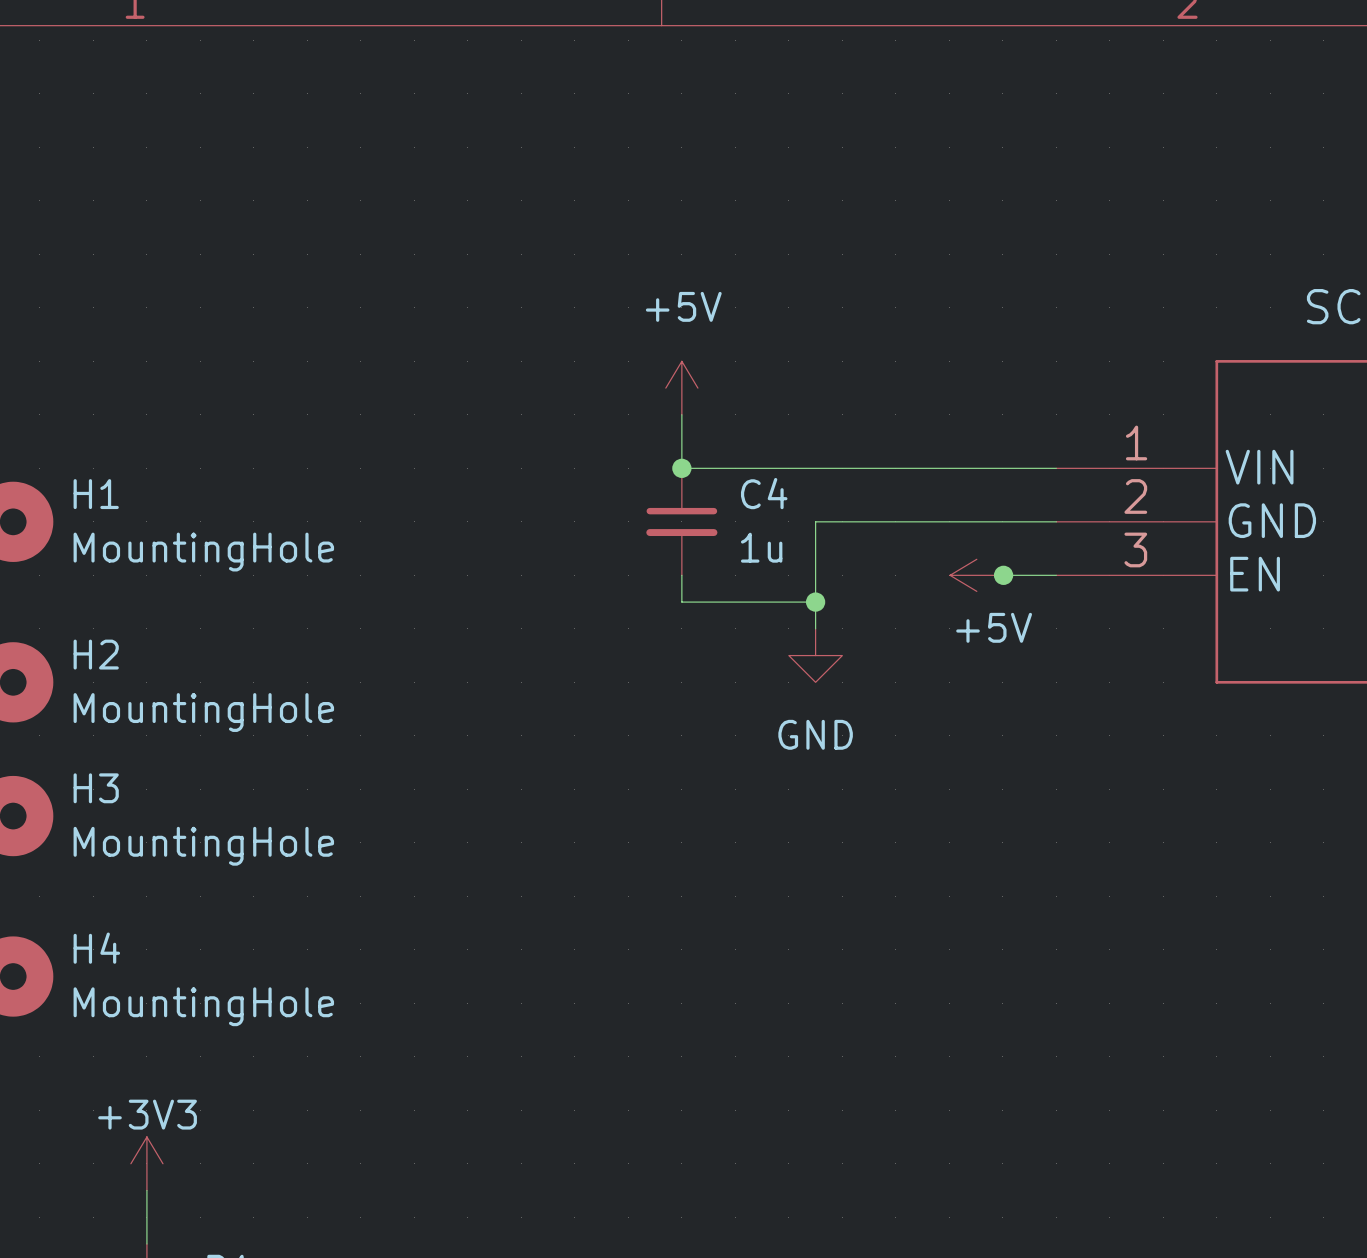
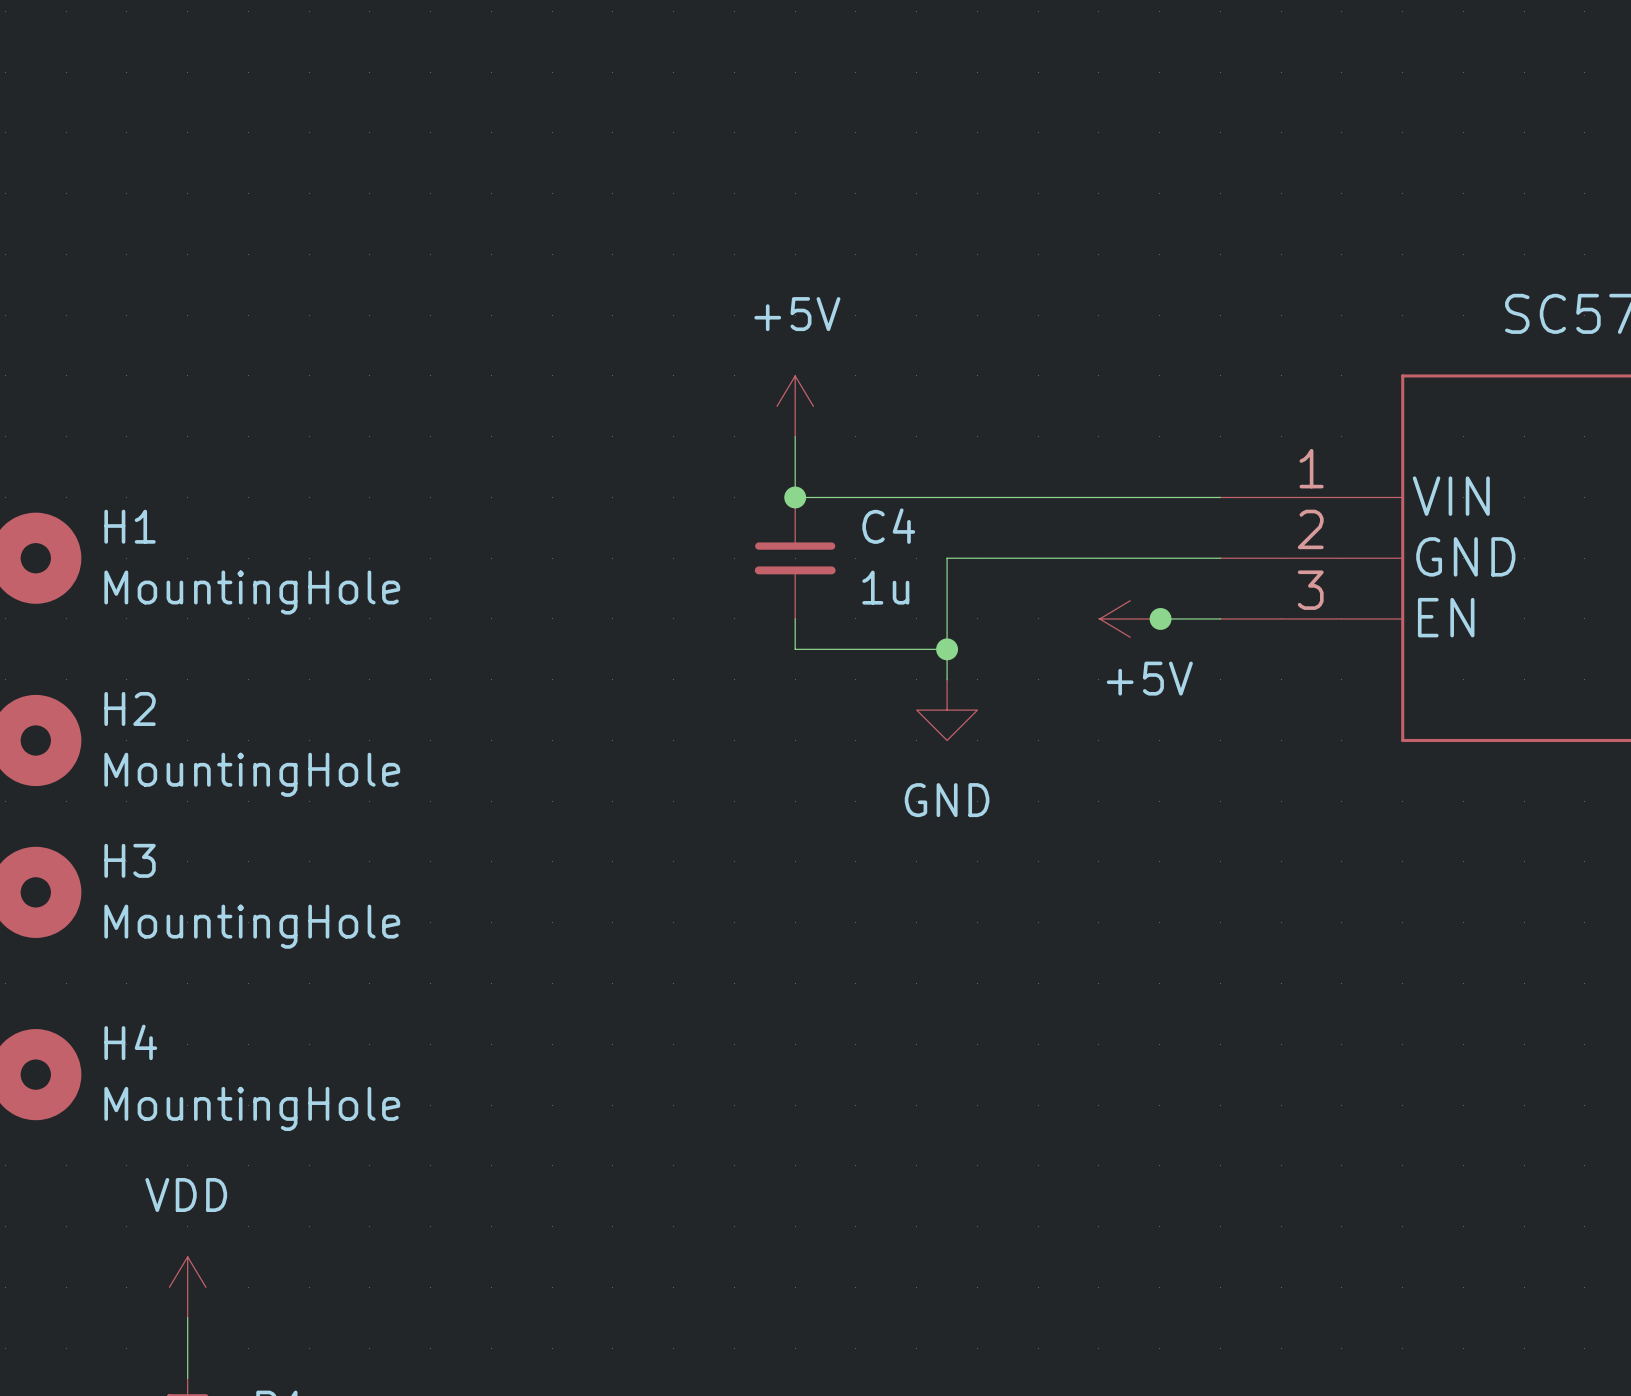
power symbol: +3V3 (146, 1163) -> VDD (187, 1287)

